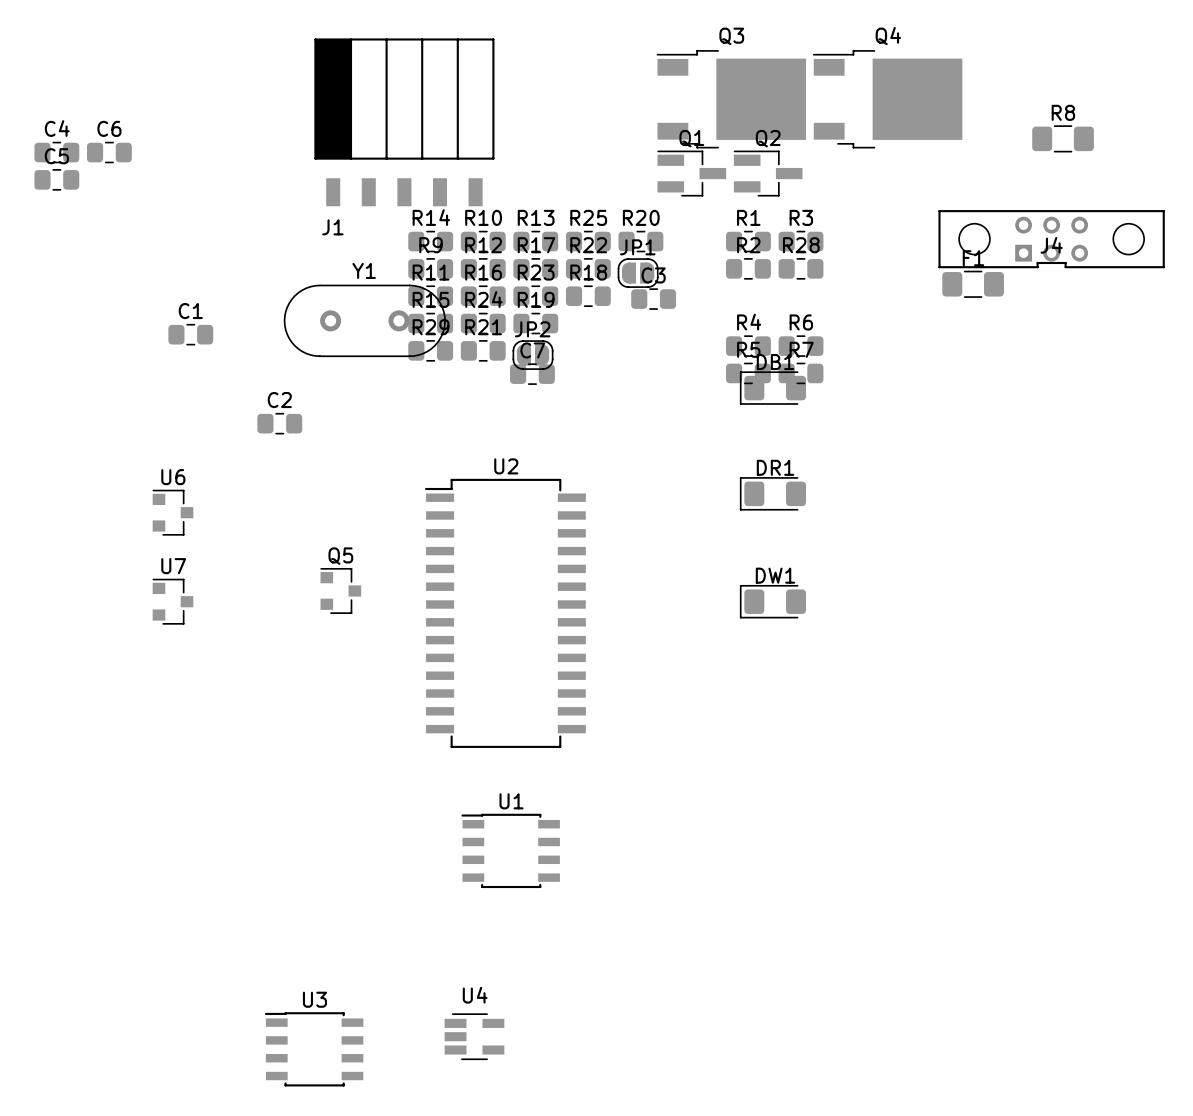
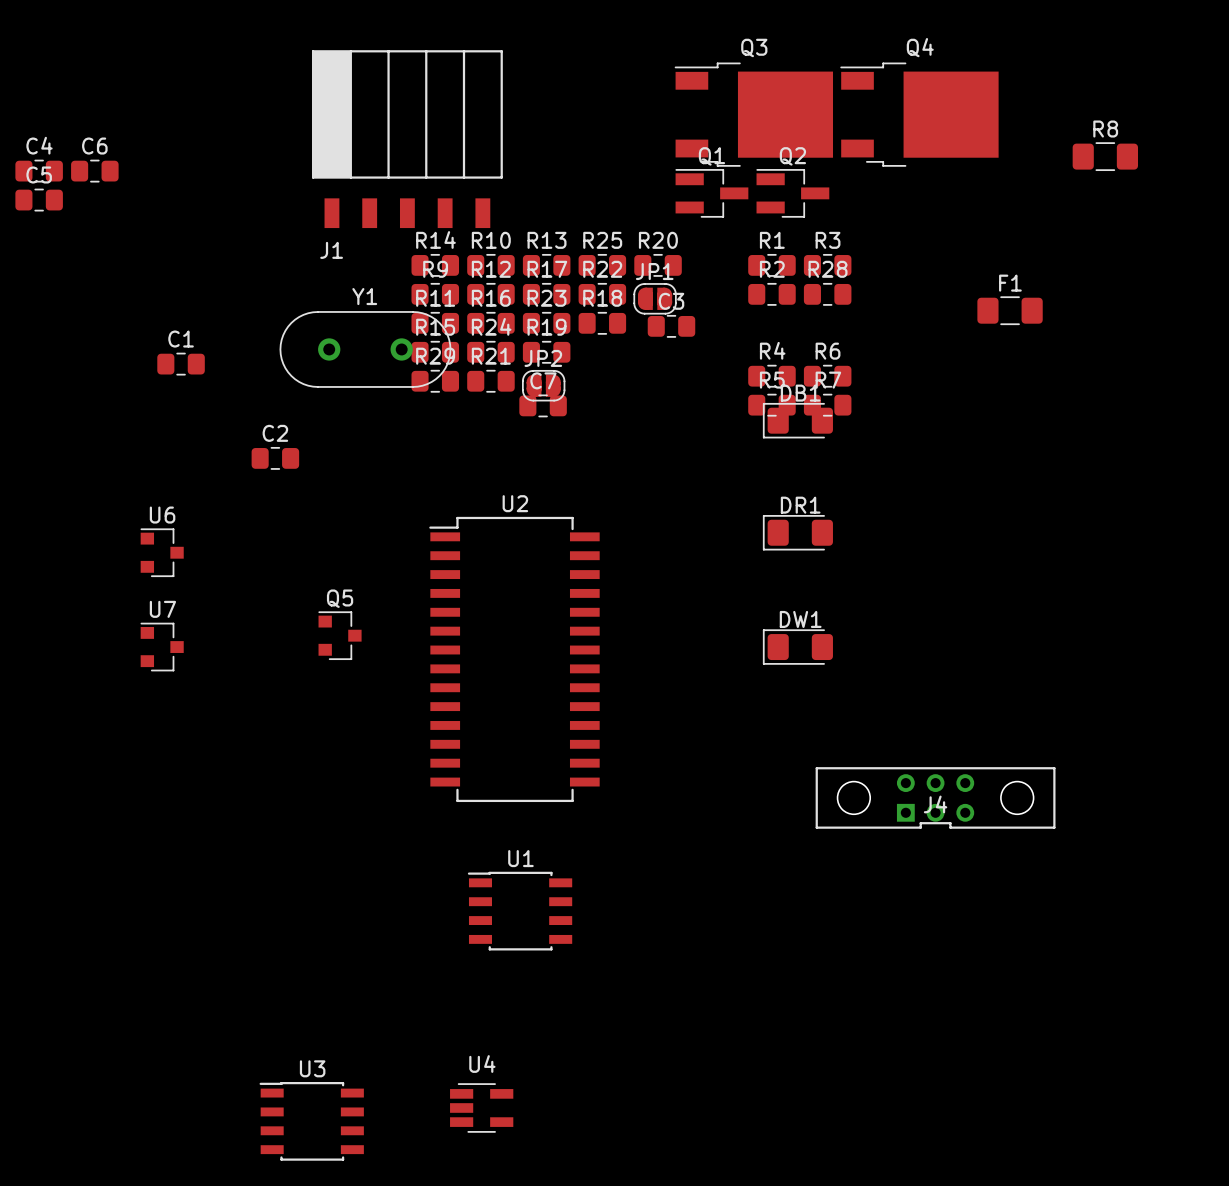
J4 position: (1051, 239) -> (935, 797)

